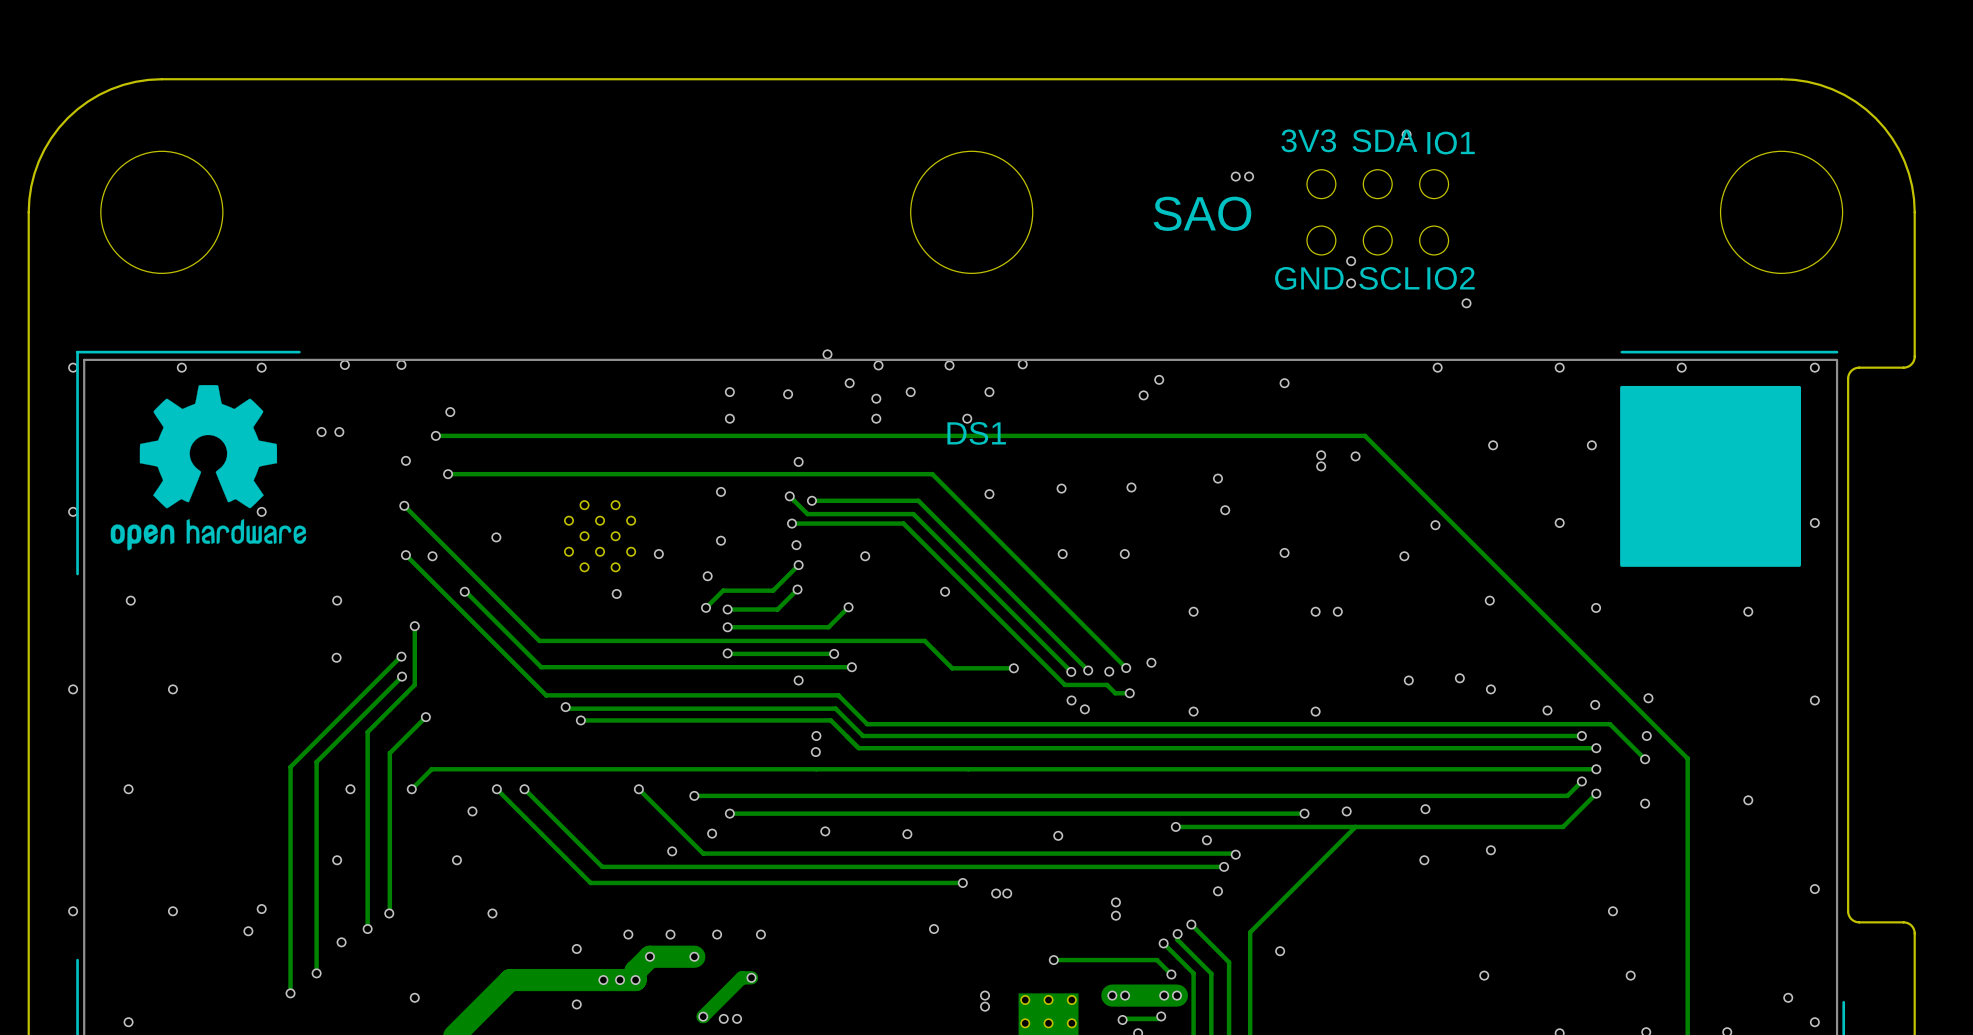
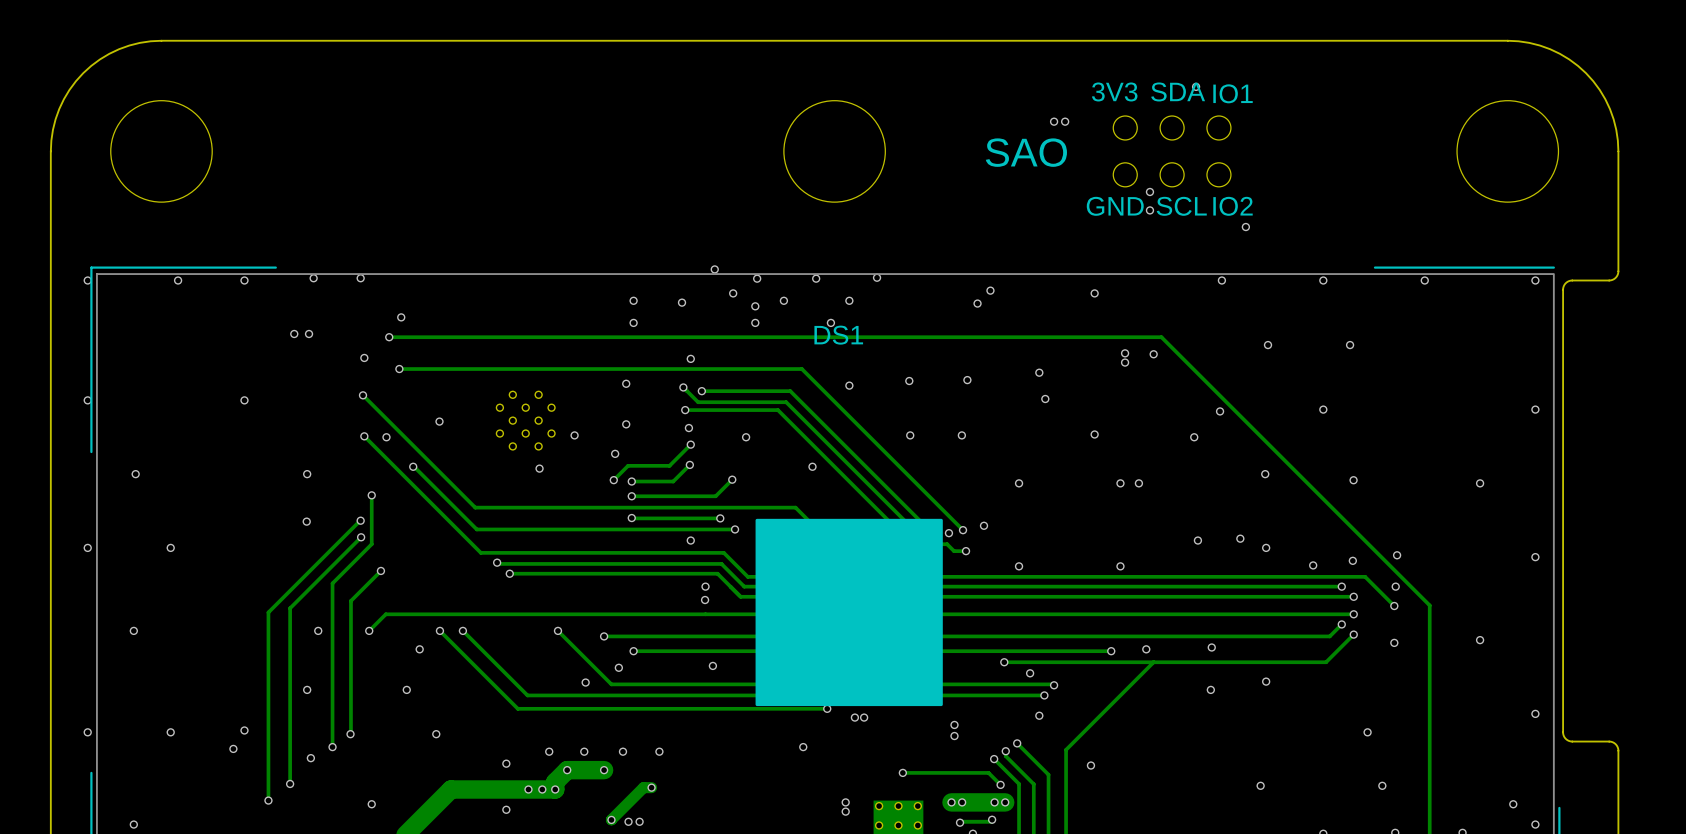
drawing: [110, 385, 307, 551] -> none
drawing: [1620, 385, 1802, 567] -> none
drawing: none -> [755, 518, 943, 707]

